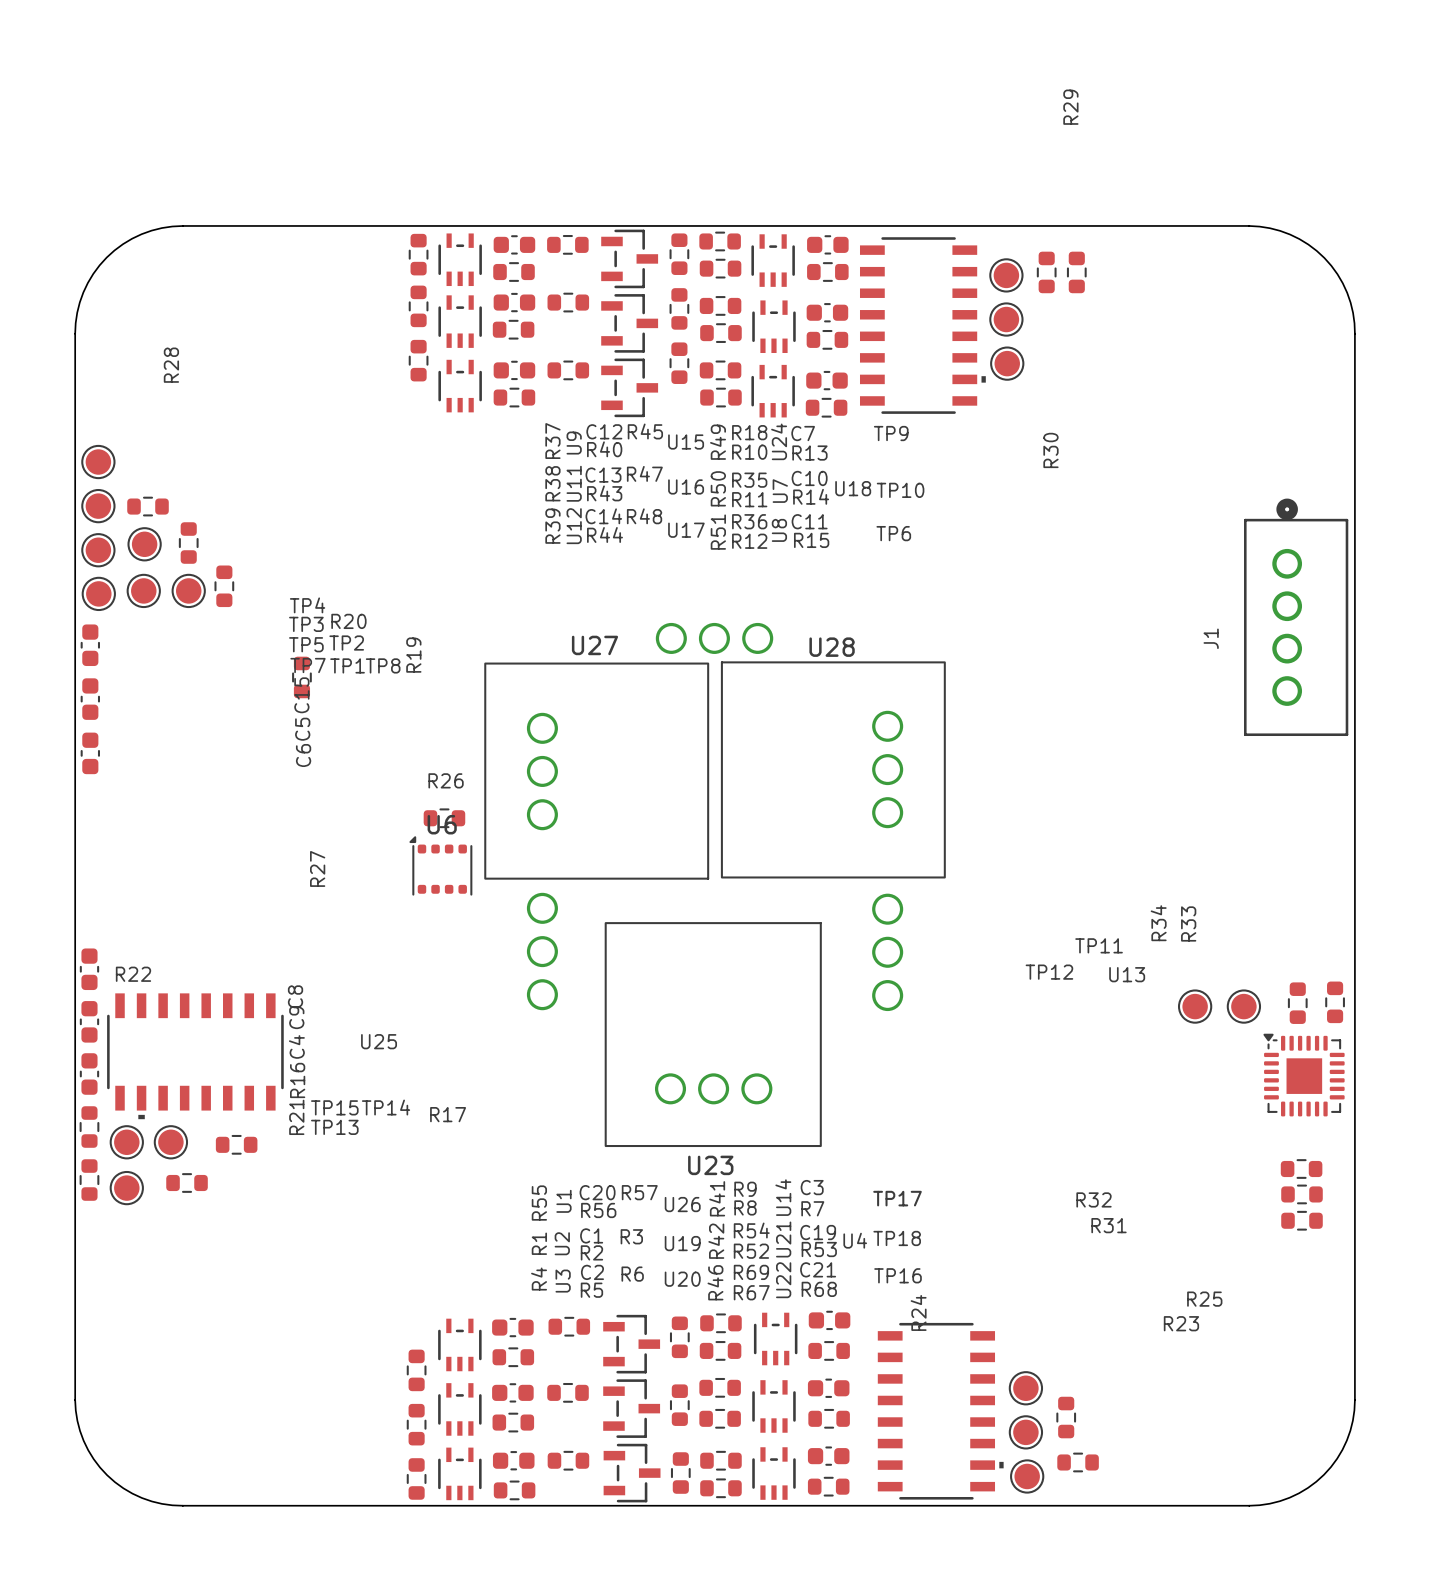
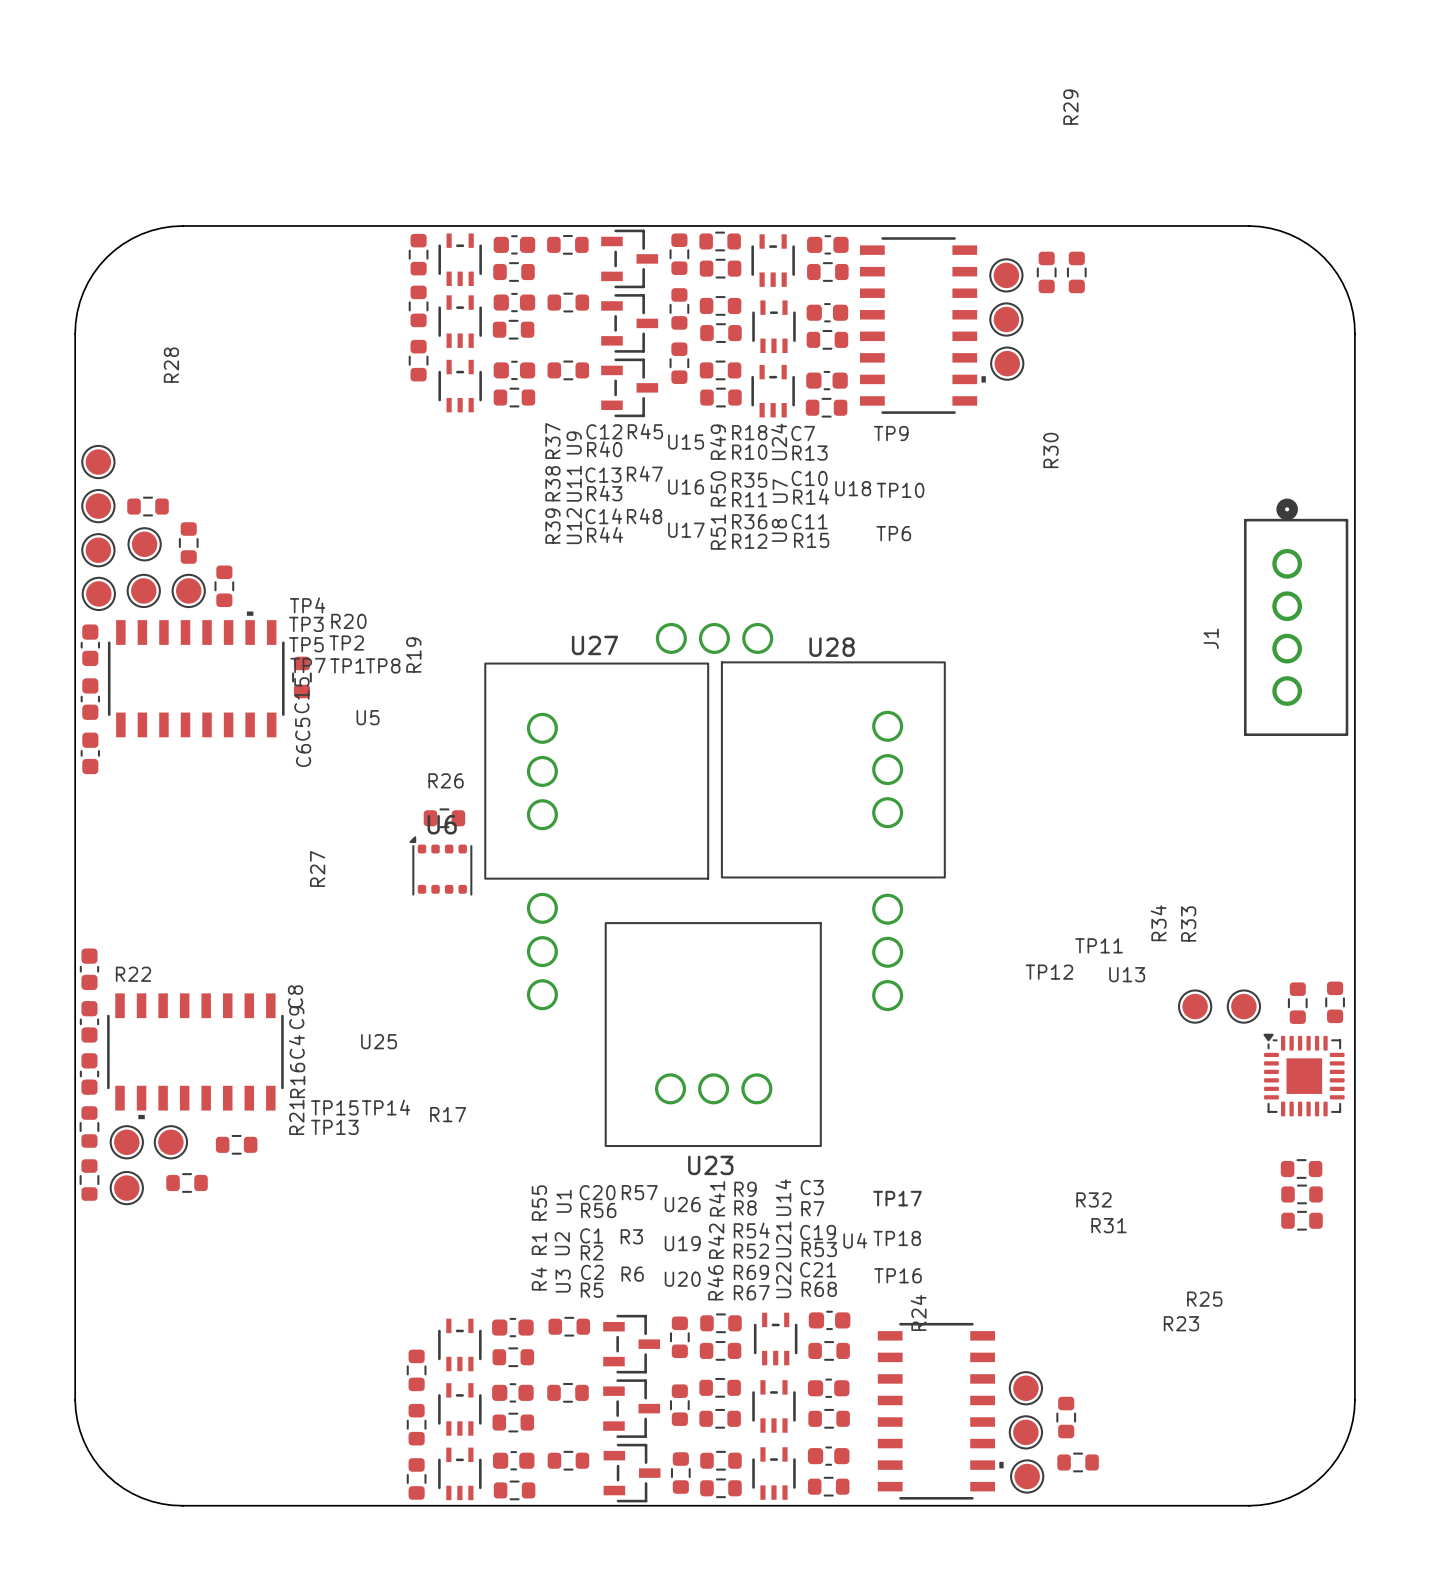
U5: none -> (196, 674)

